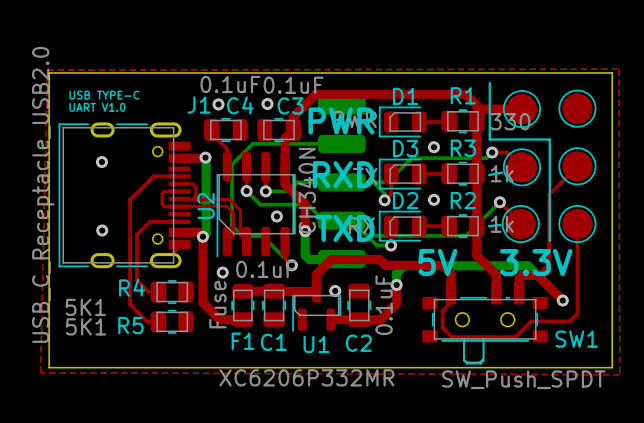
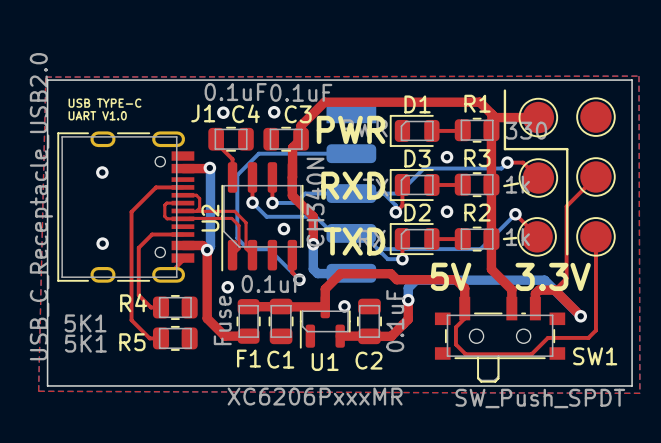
U1 value: XC6206P332MR (306, 377) -> XC6206PxxxMR (315, 396)

